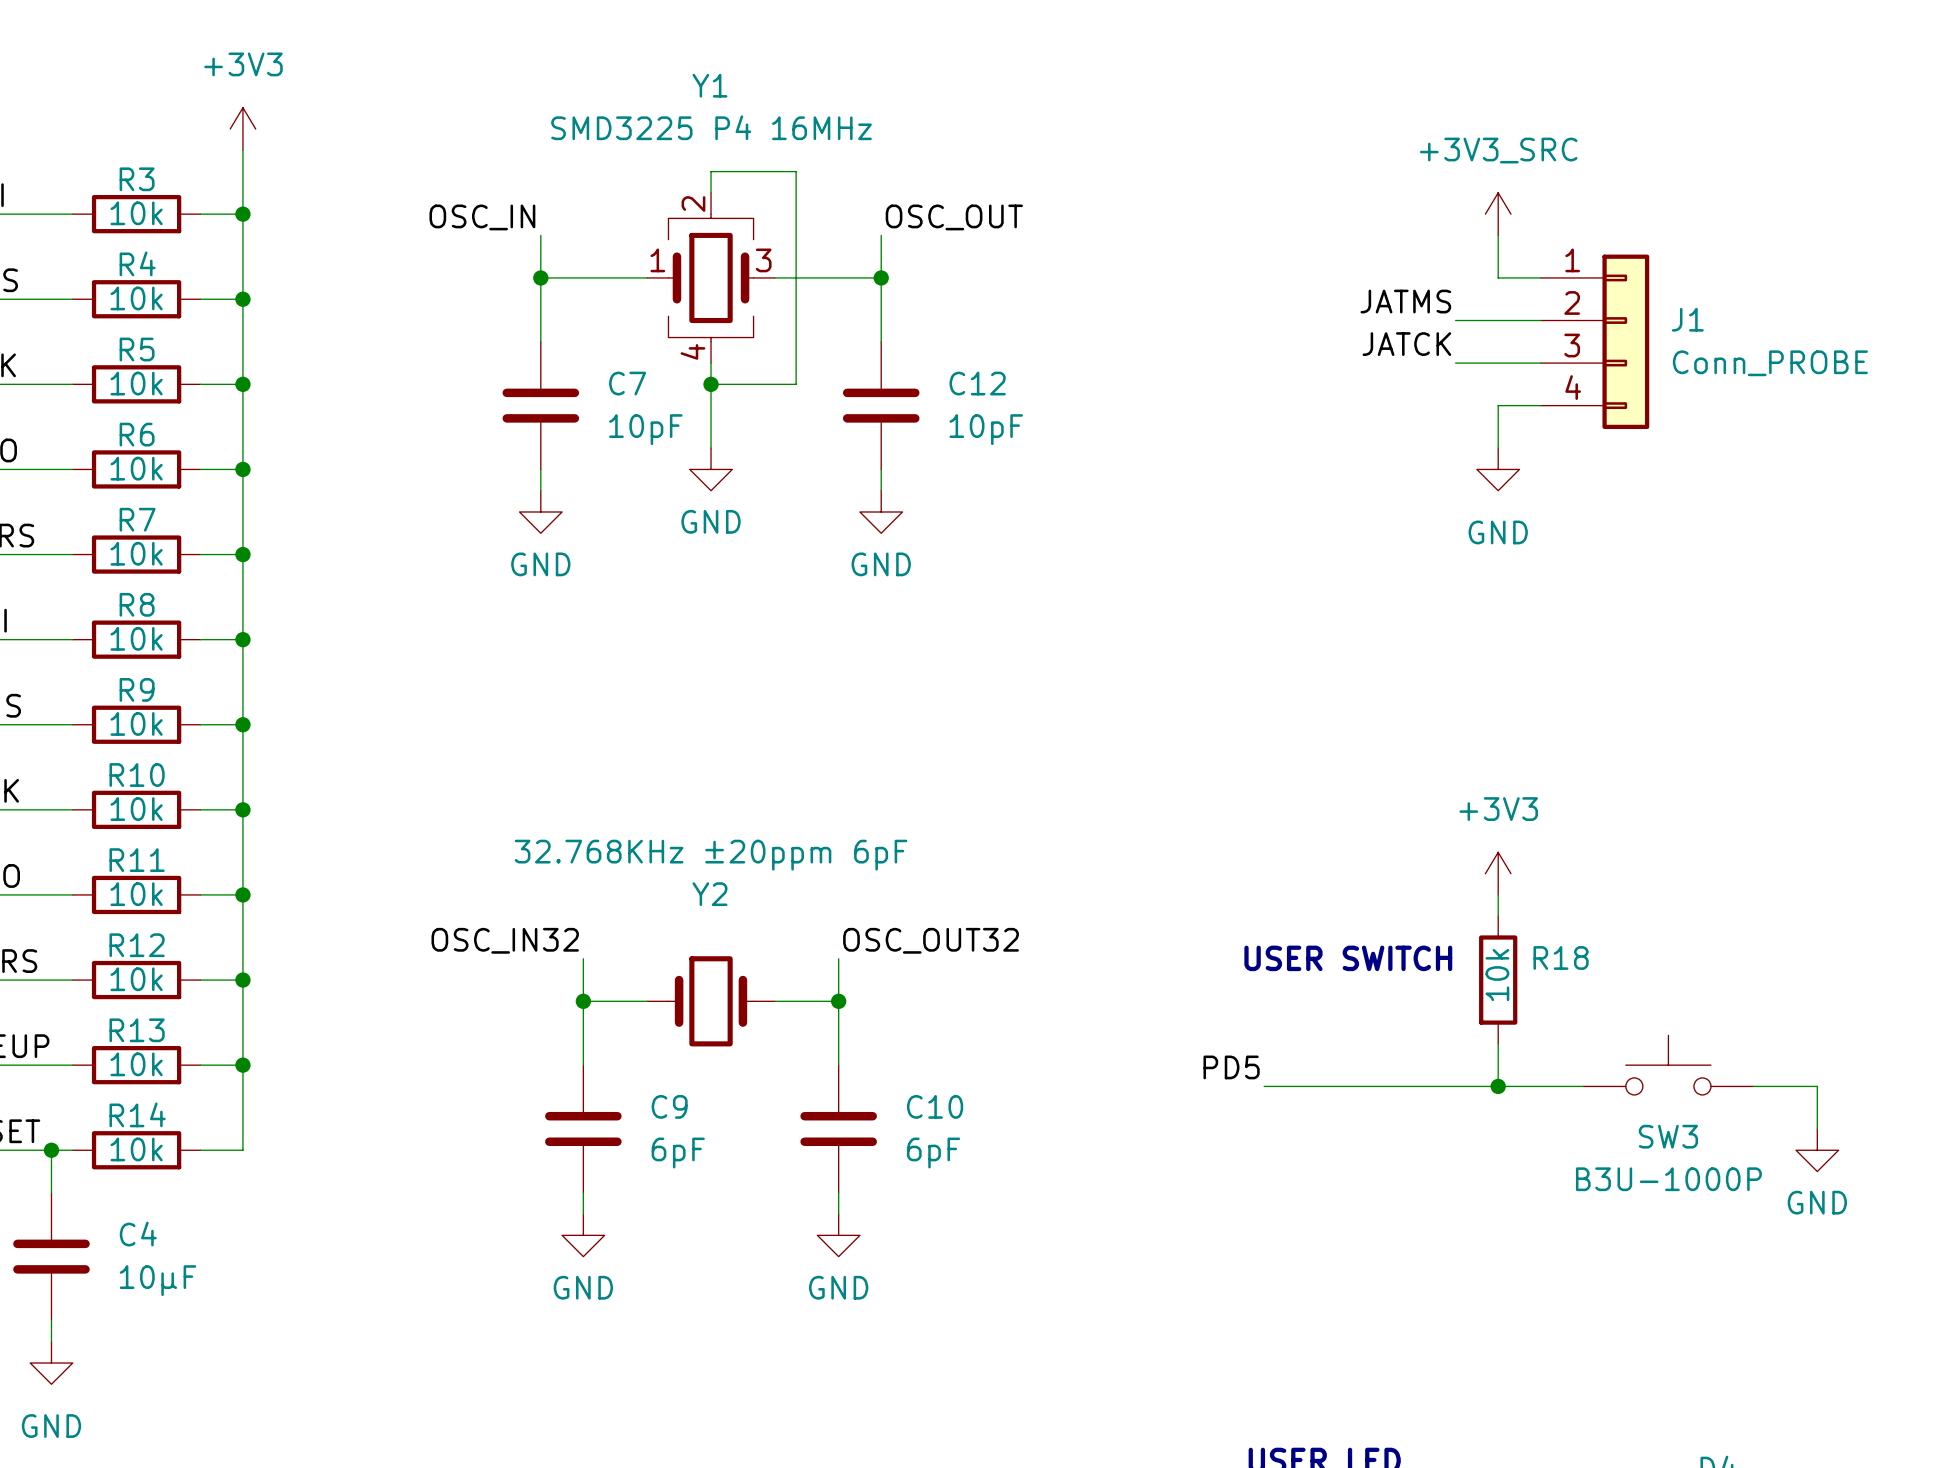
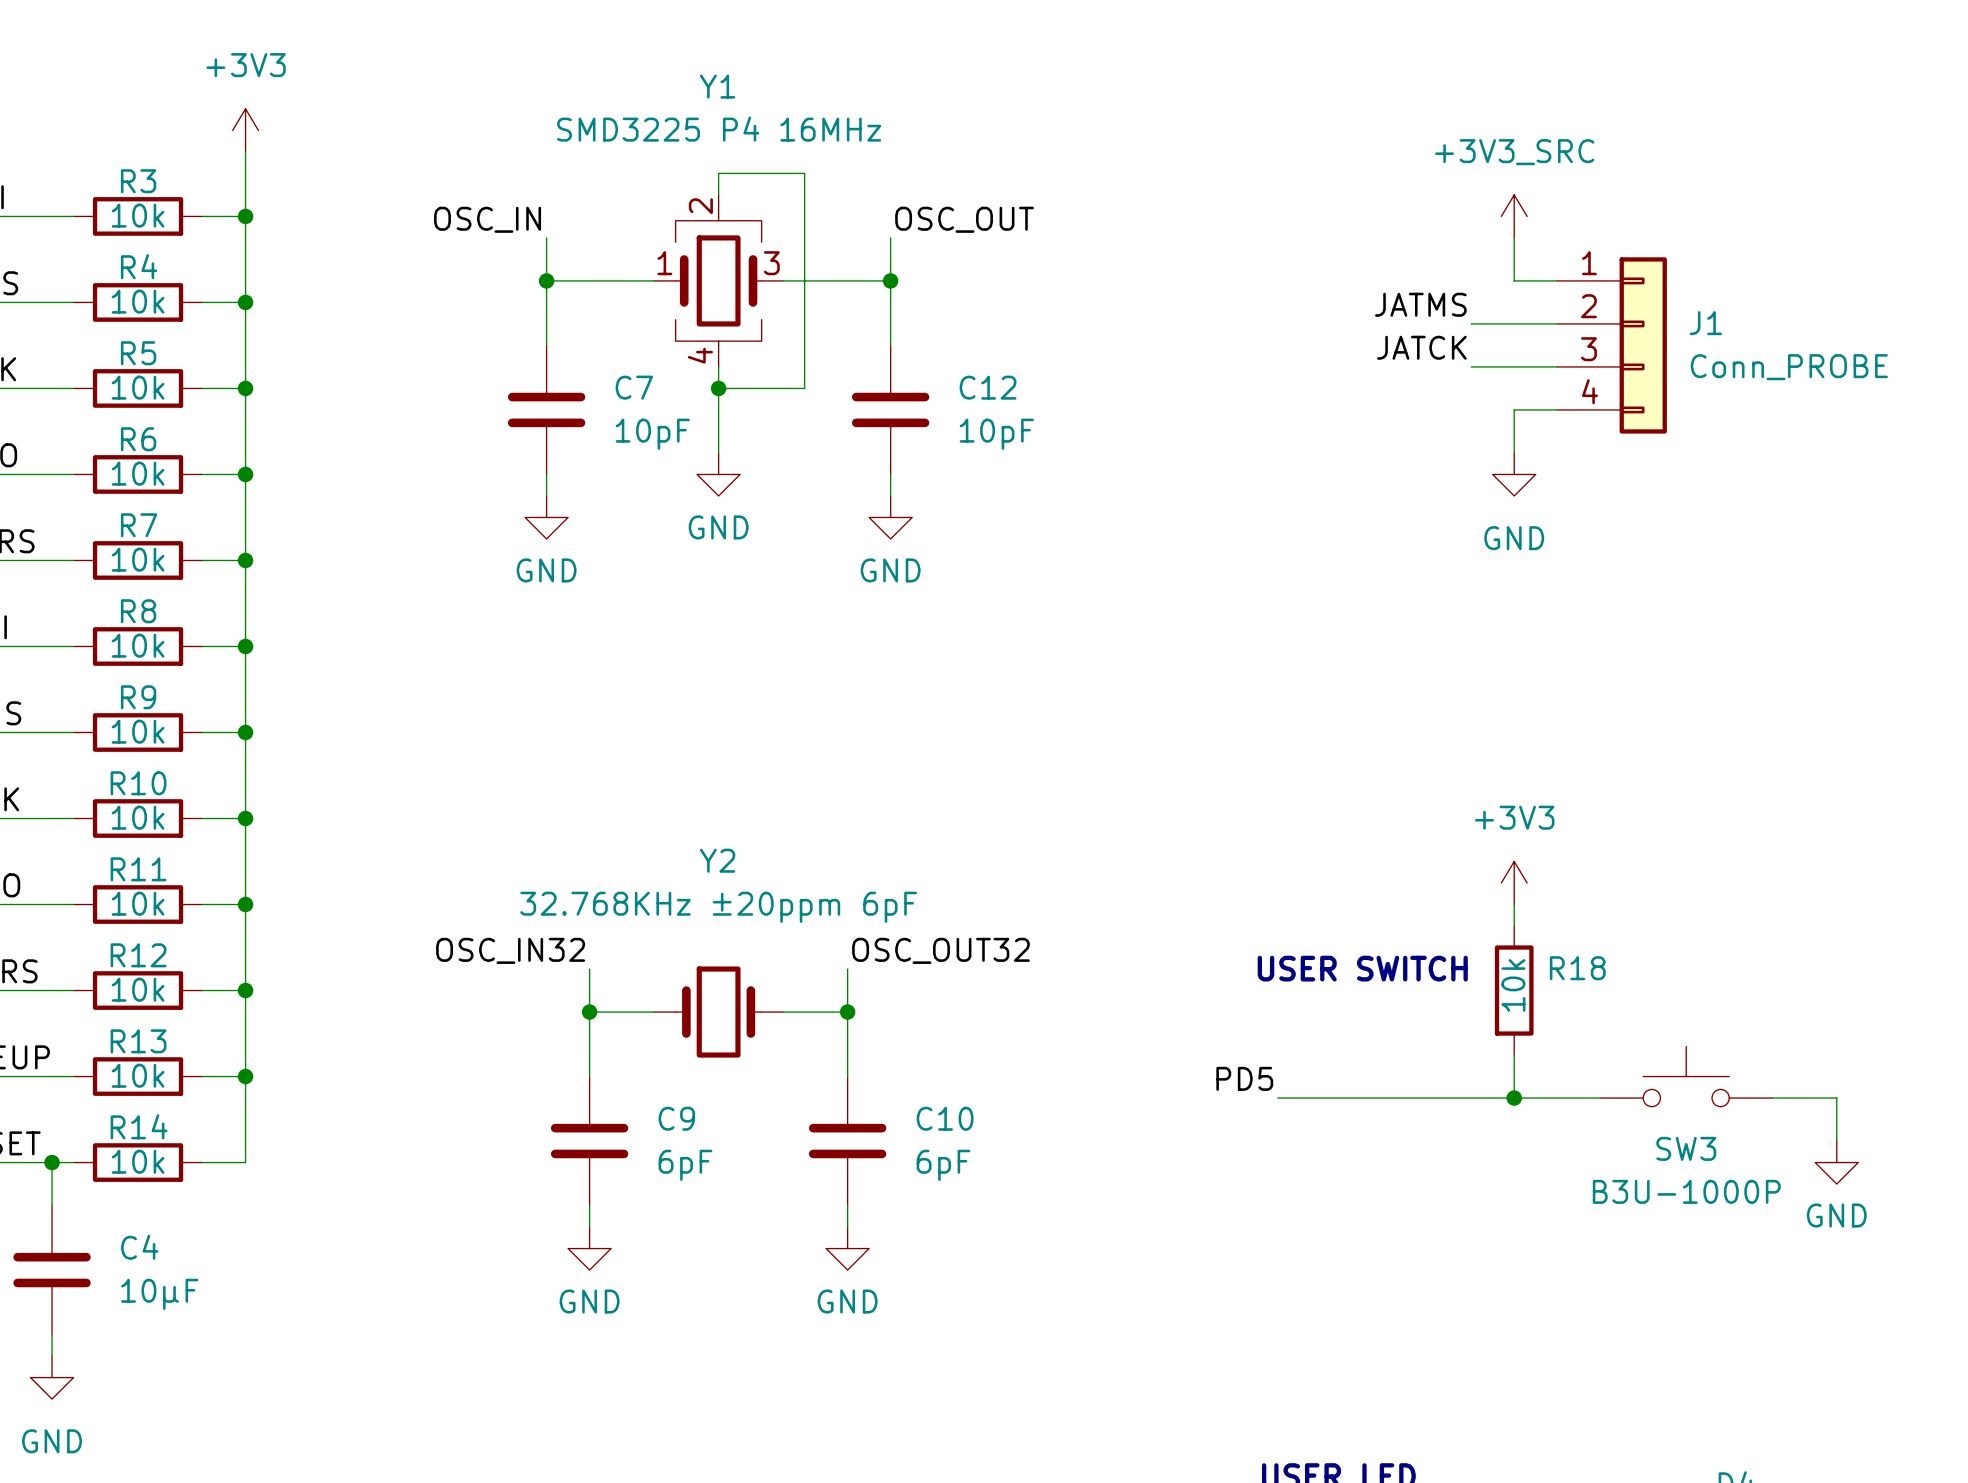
Y2 value position: 32.768KHz ±20ppm 6pF (711, 855) -> 32.768KHz ±20ppm 6pF (718, 907)
Y2 name position: Y2 (710, 894) -> Y2 (717, 860)

